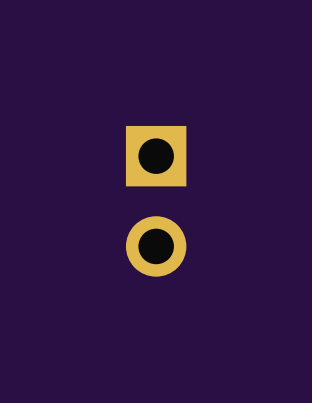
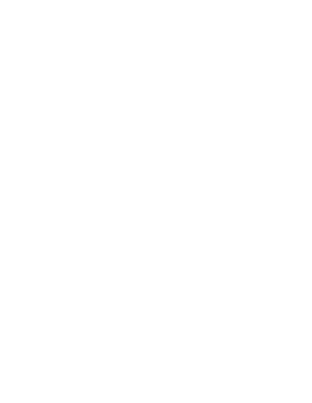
part: (156, 201) -> none

